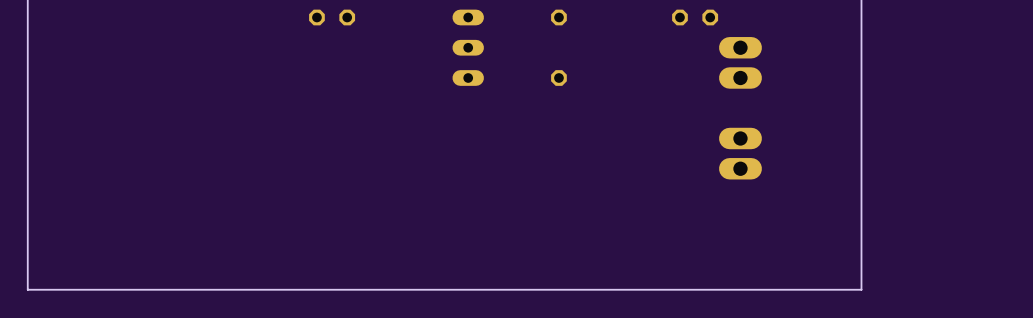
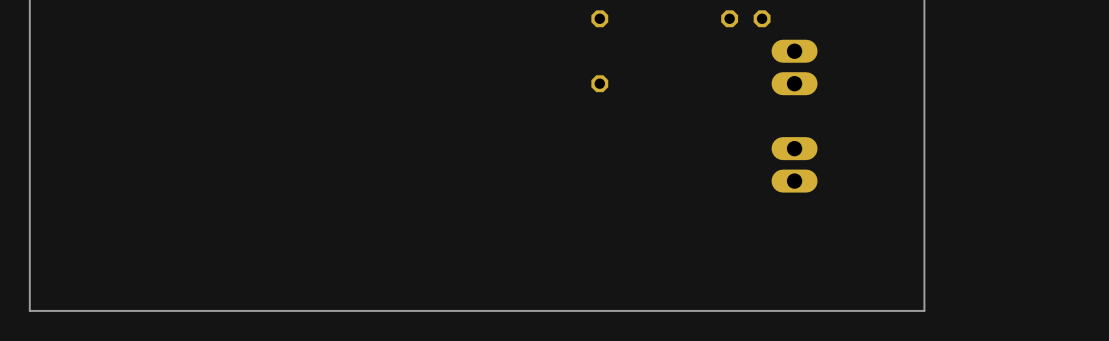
part: (332, 17) -> none
part: (468, 47) -> none

